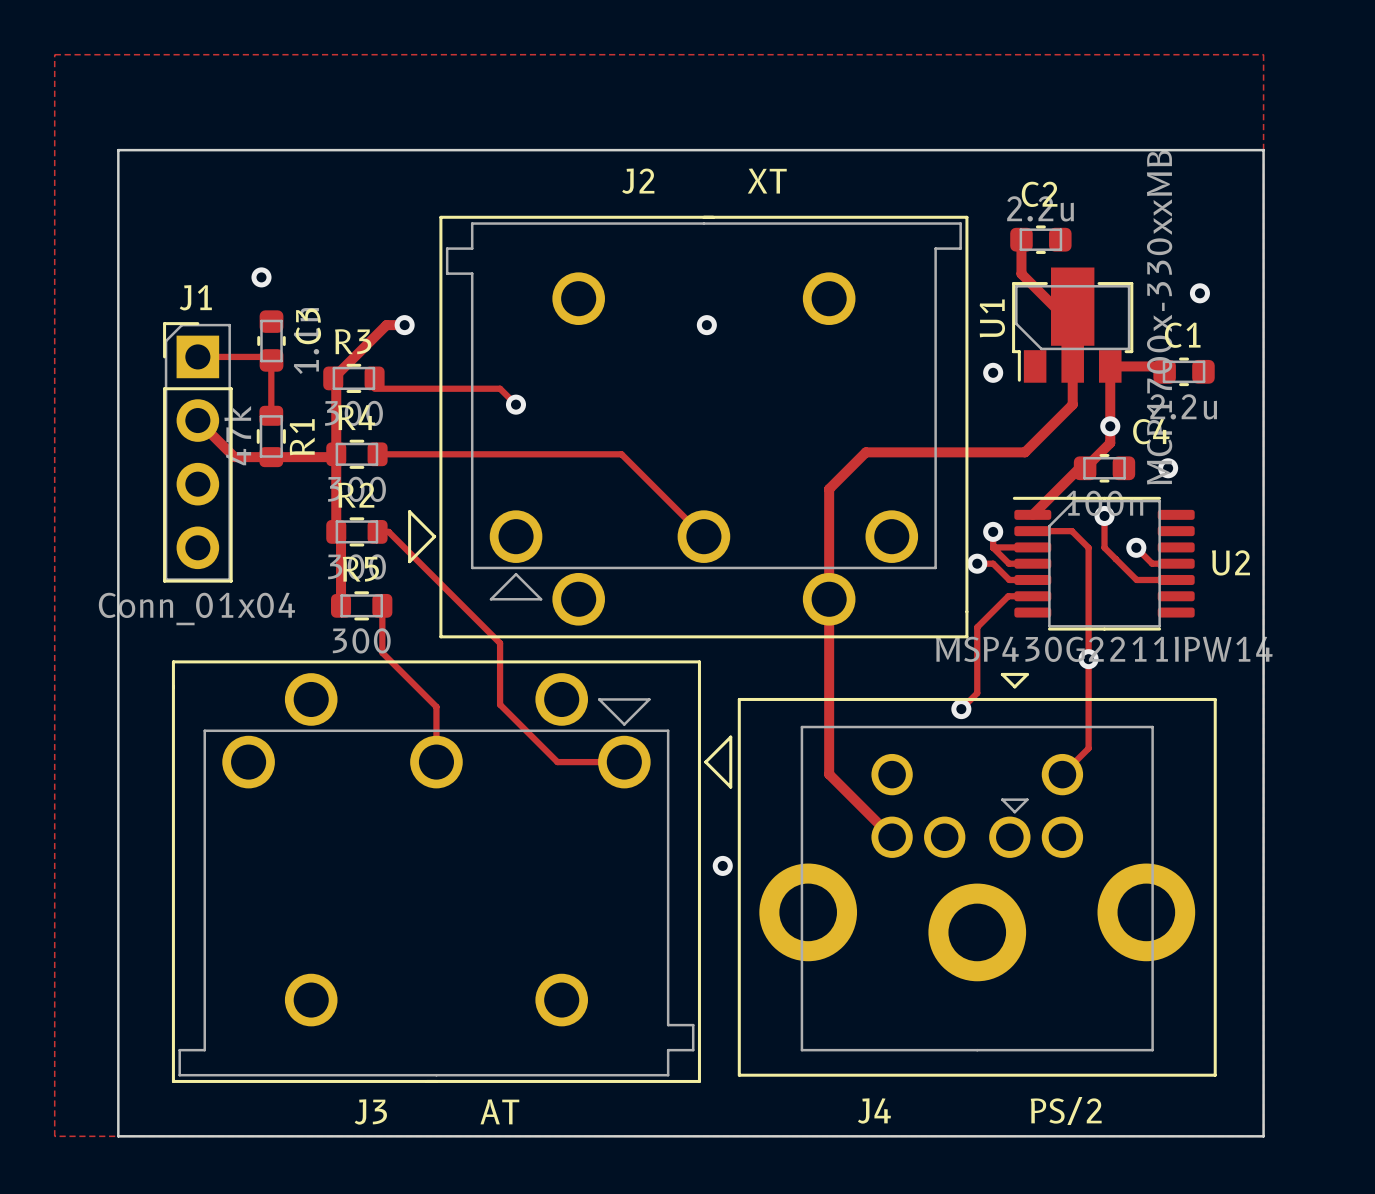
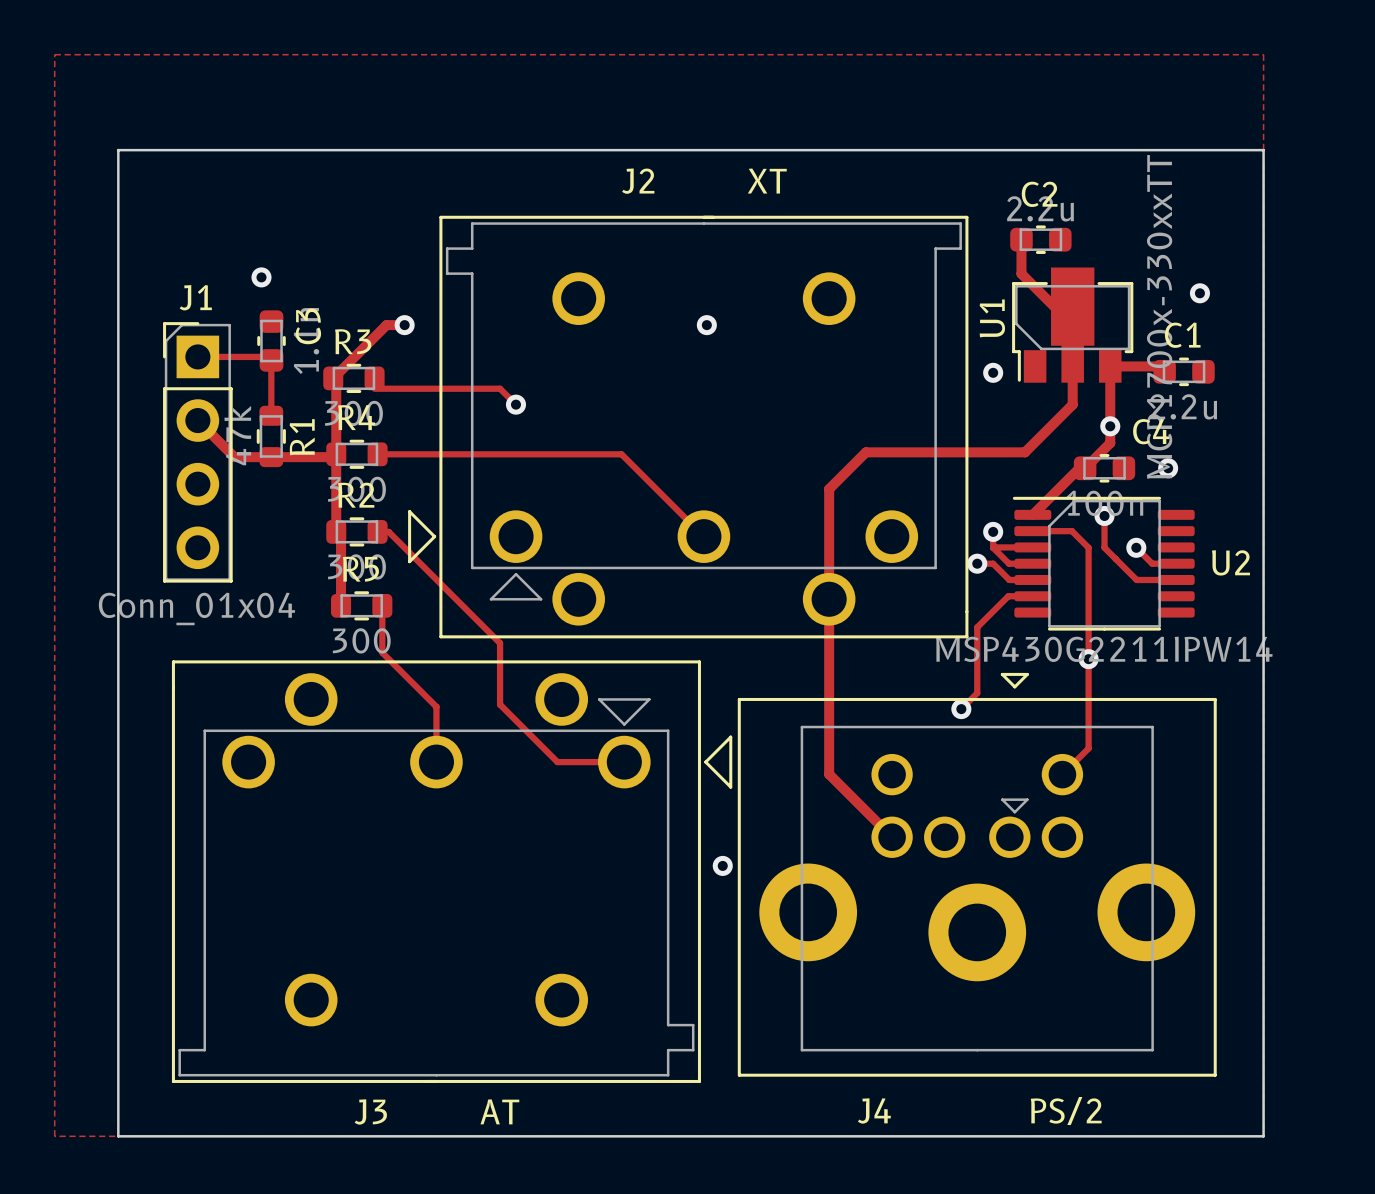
U1 value: MCP1700x-330xxMB (1159, 317) -> MCP1700x-330xxTT (1159, 316)

